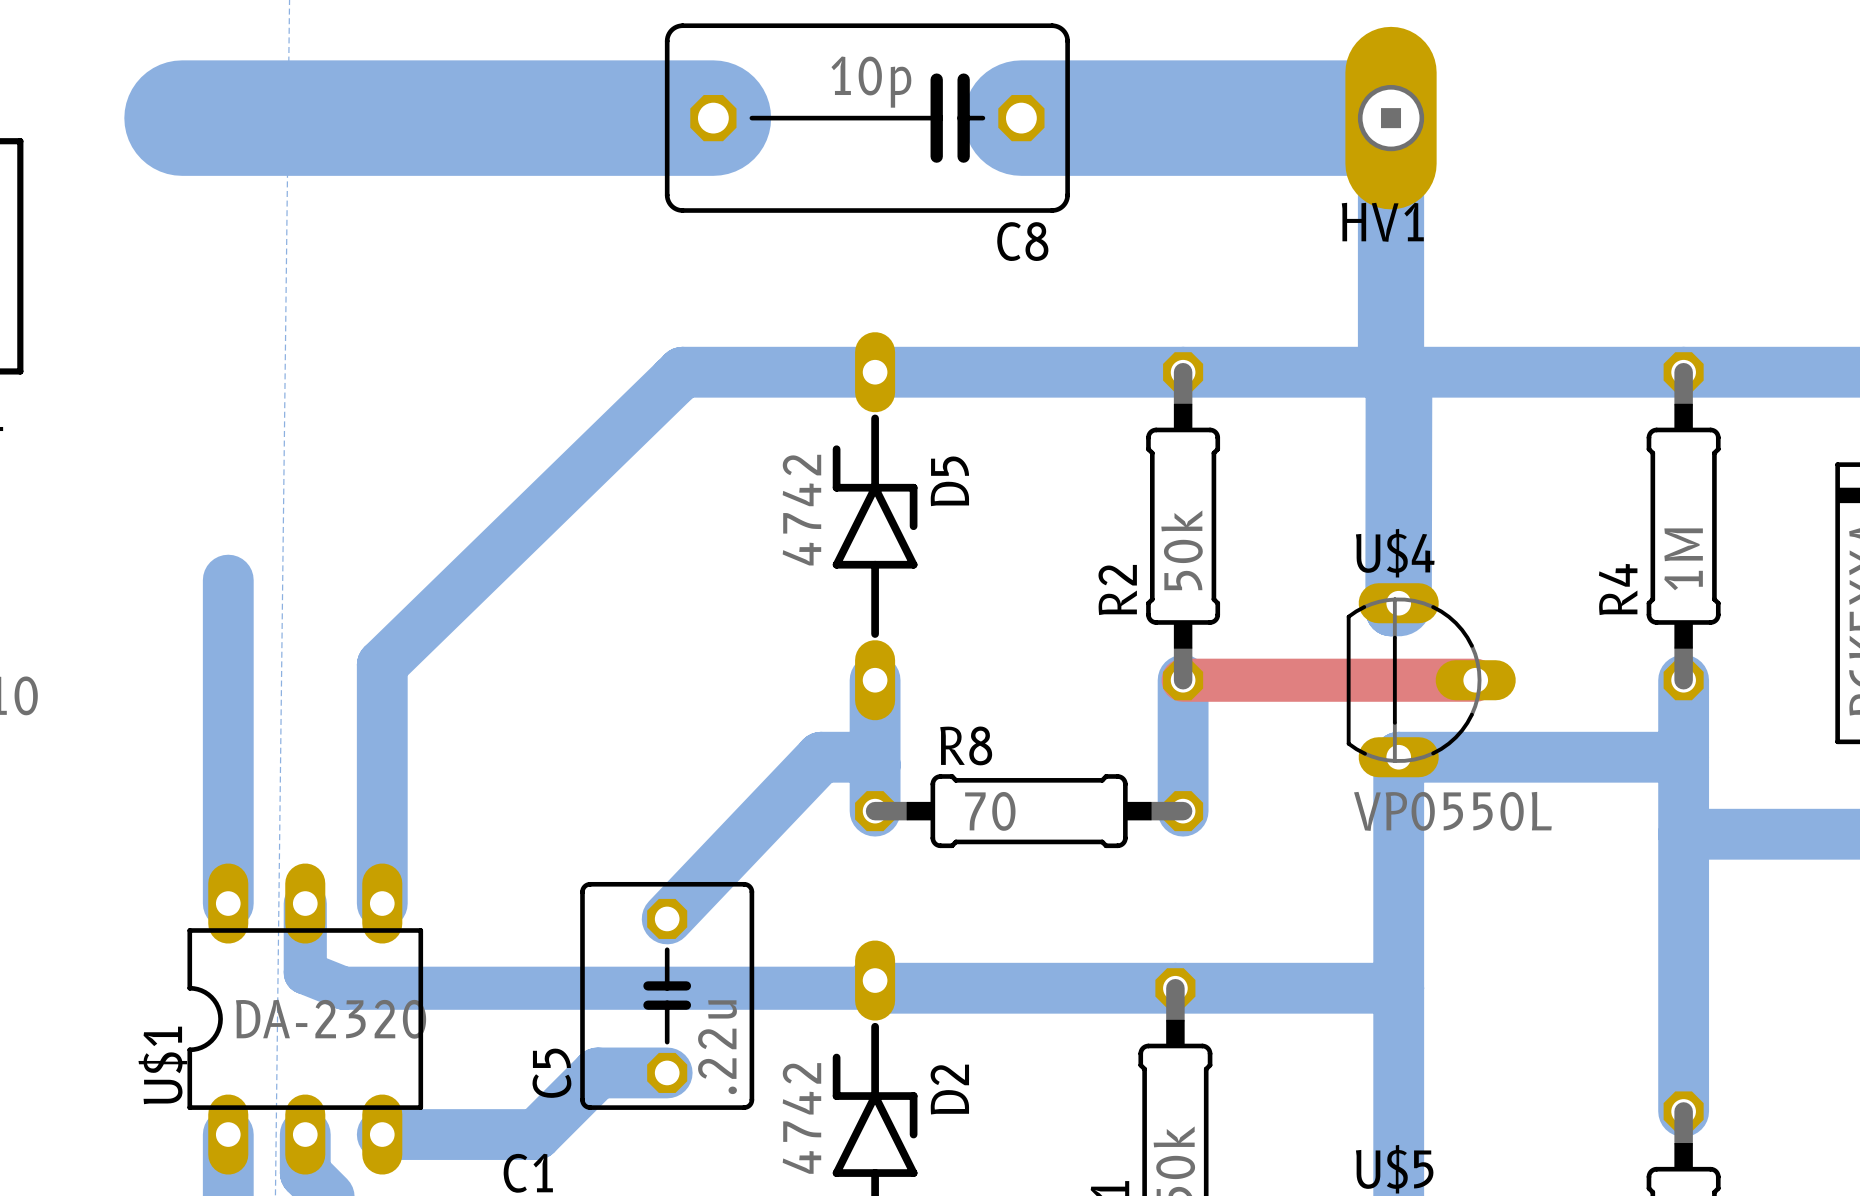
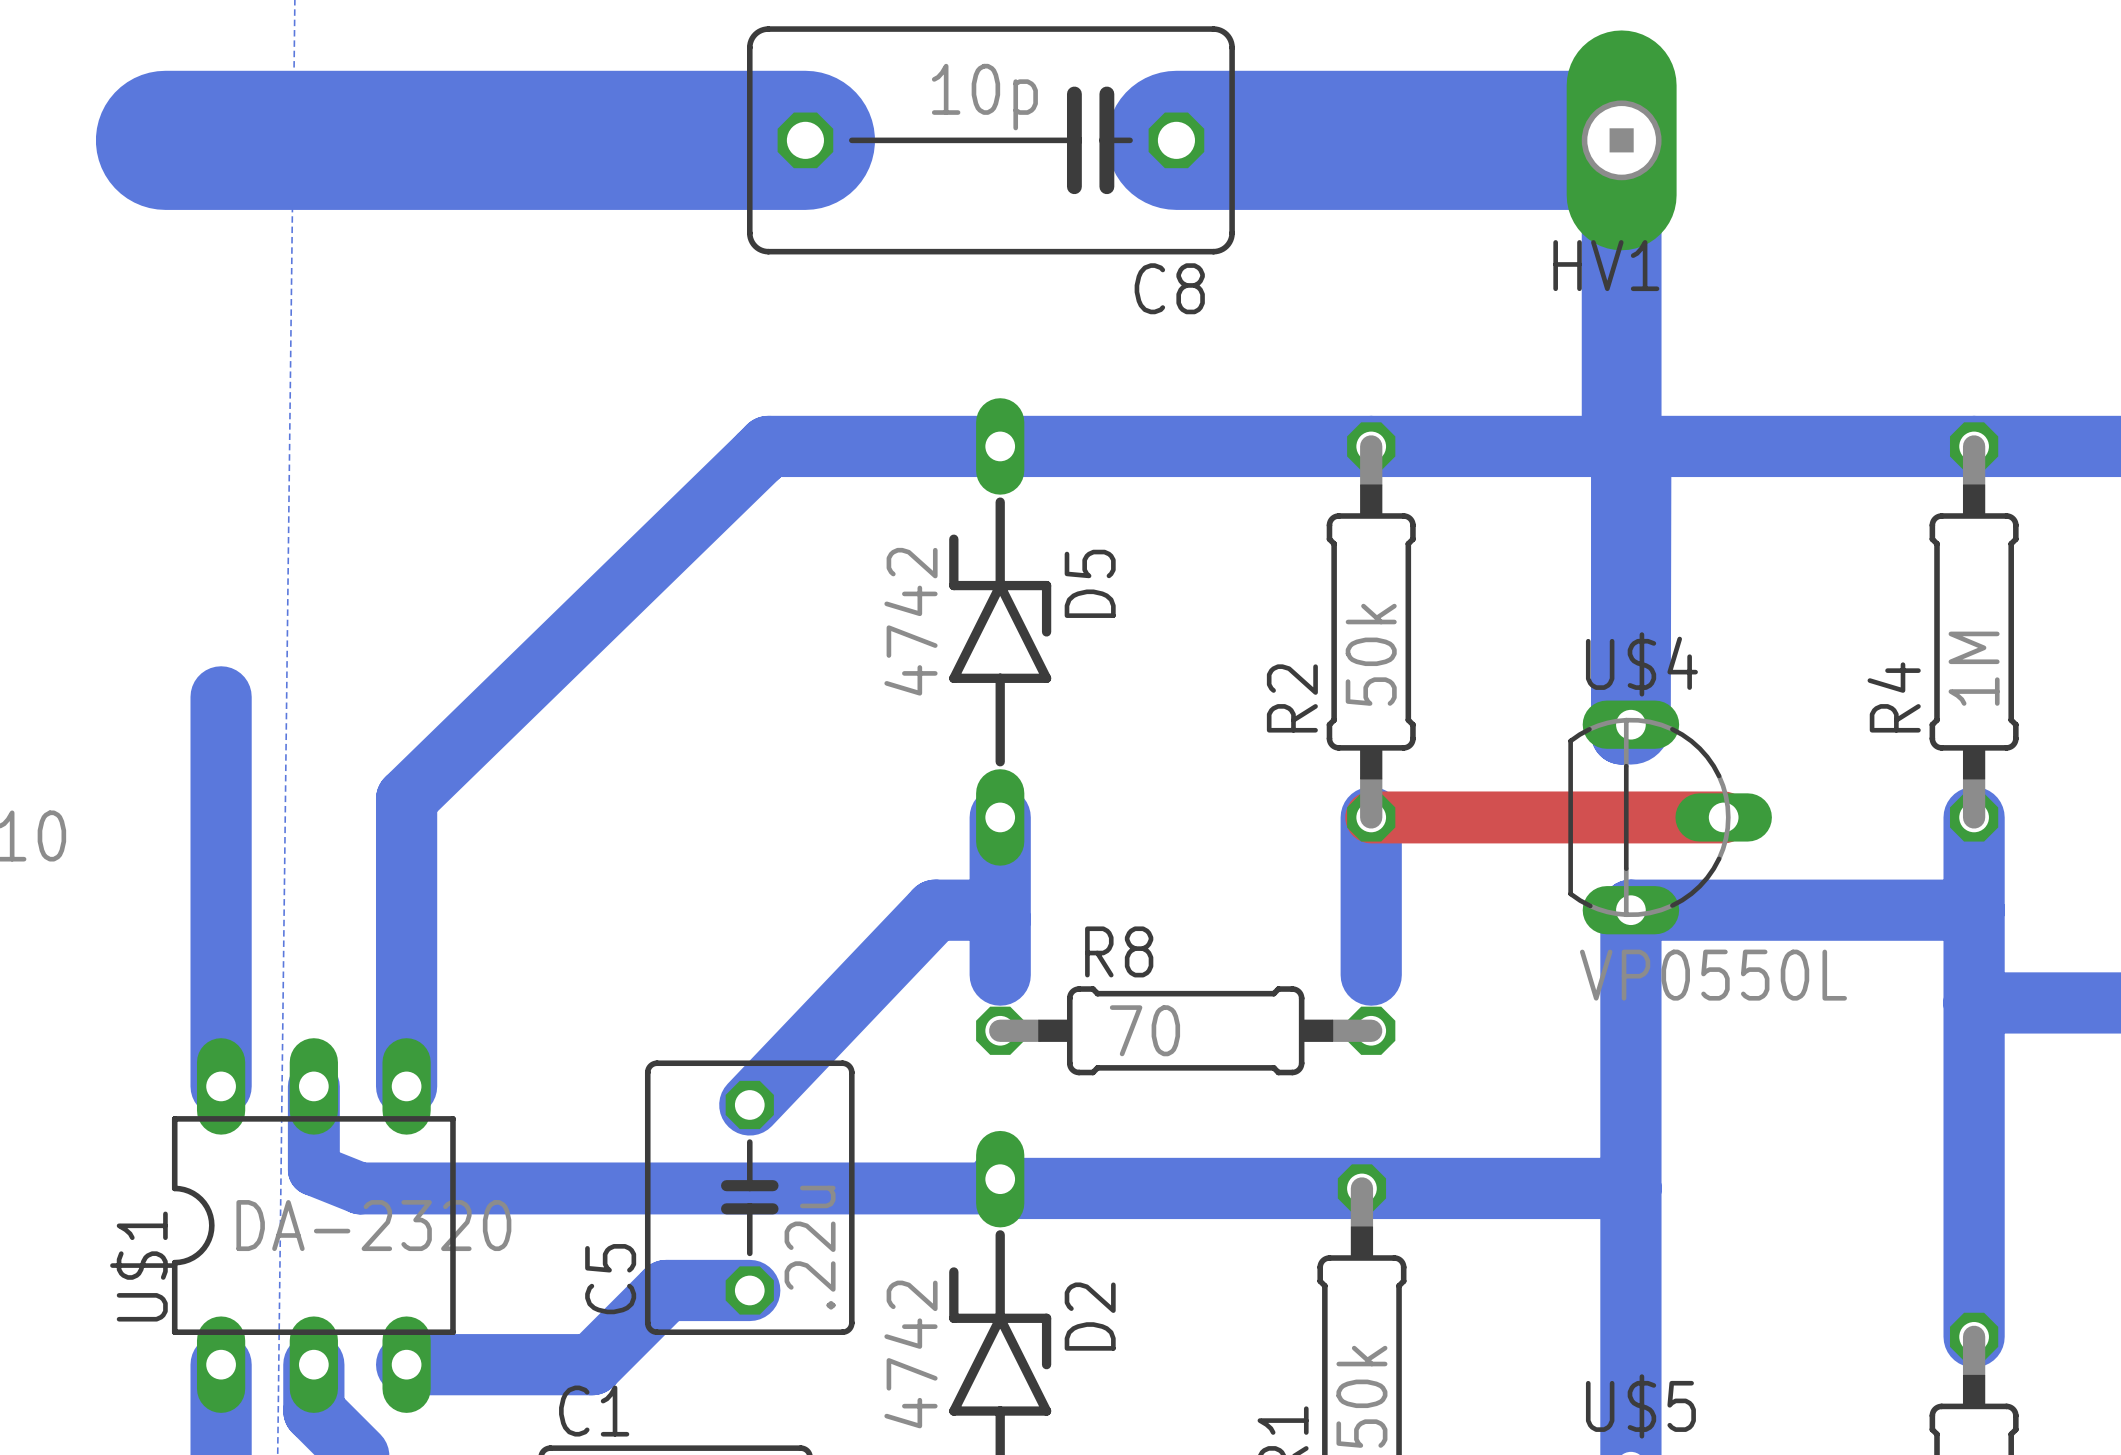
R8 position: (1029, 811) -> (1185, 1030)

